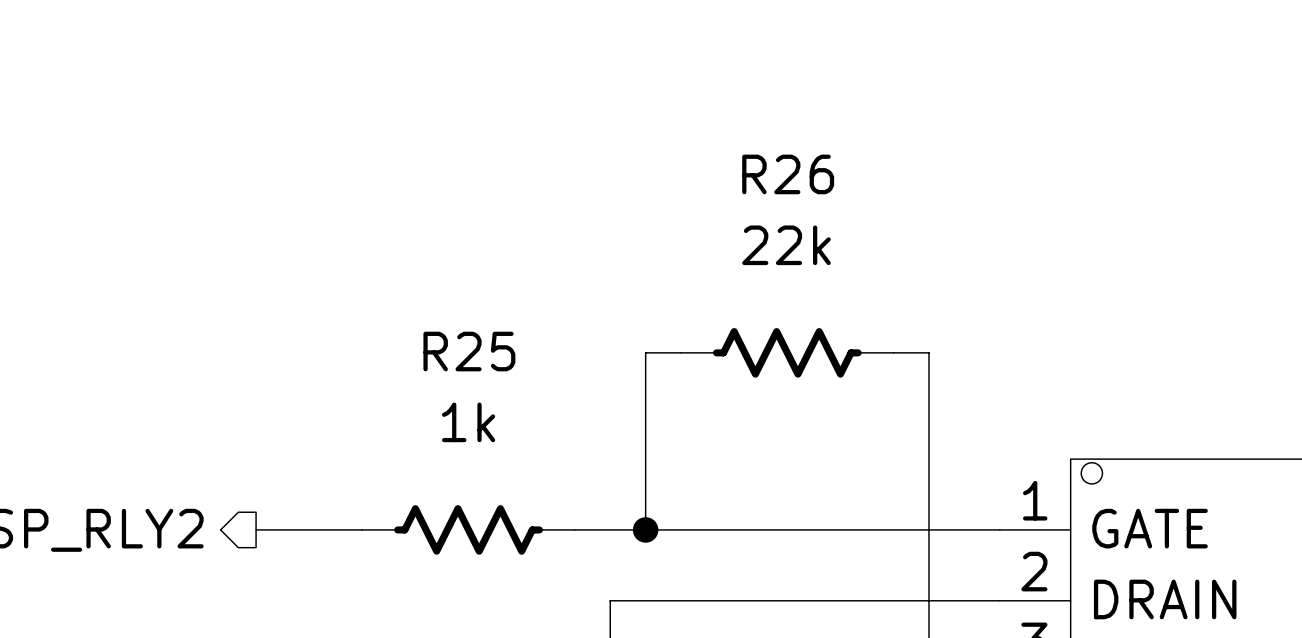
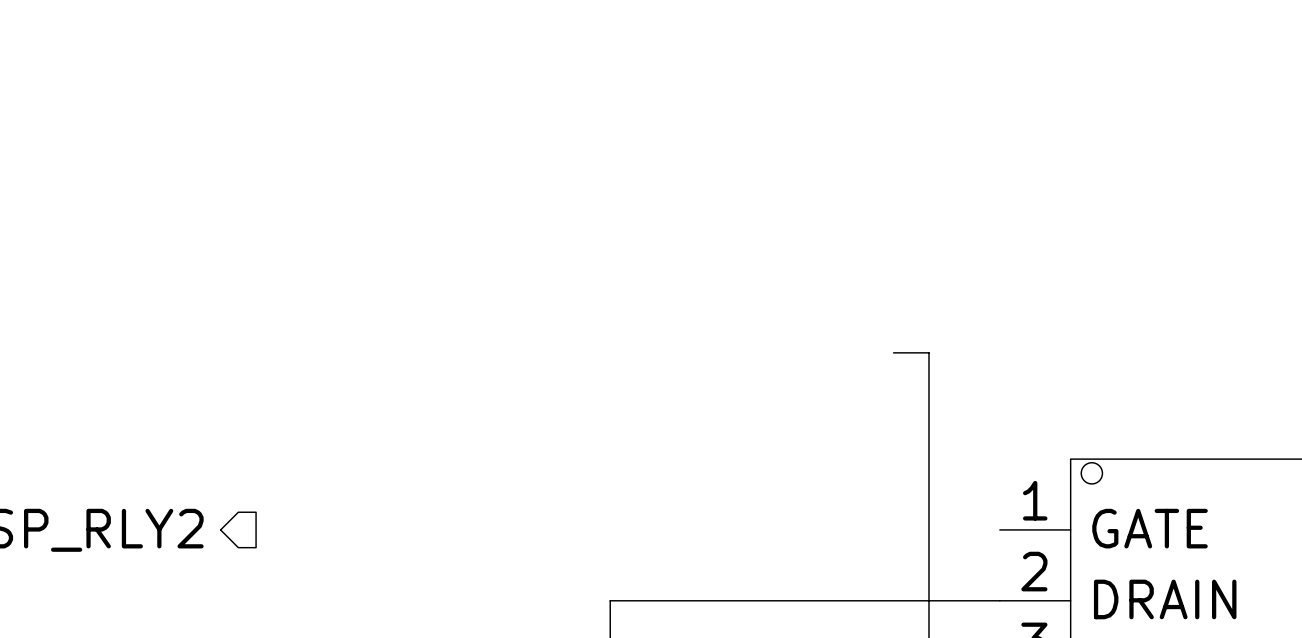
wire: (681, 352) (645, 352) (645, 529) -> none
R26: 22k (787, 352) -> none
wire: (256, 529) (362, 529) -> none
R25: 1k (468, 529) -> none
wire: (574, 529) (999, 529) -> none
junction: (645, 529) -> none

